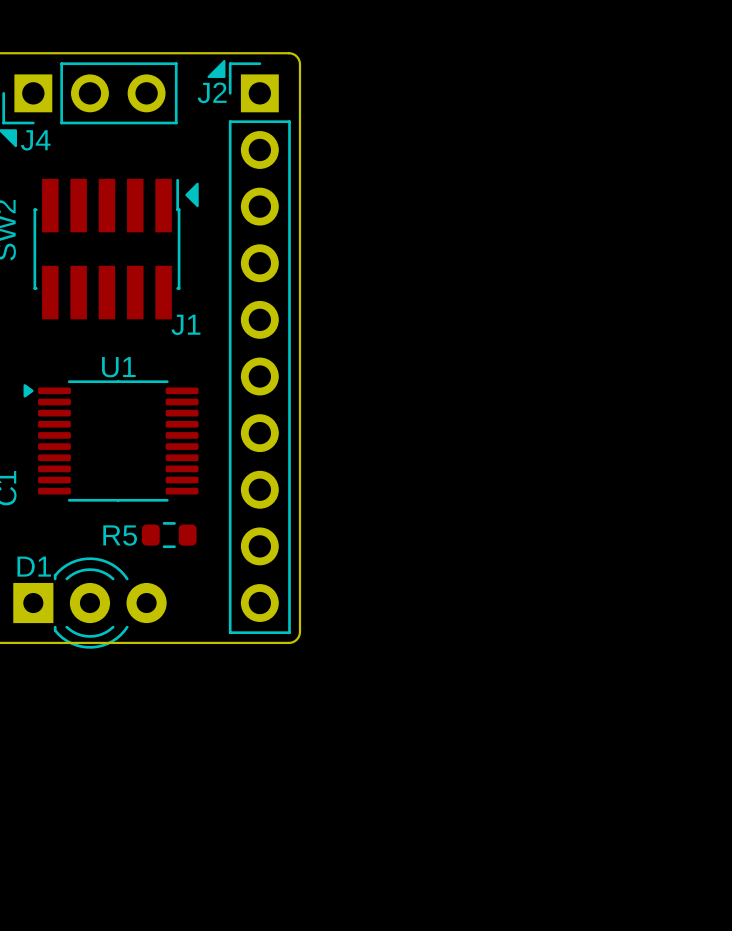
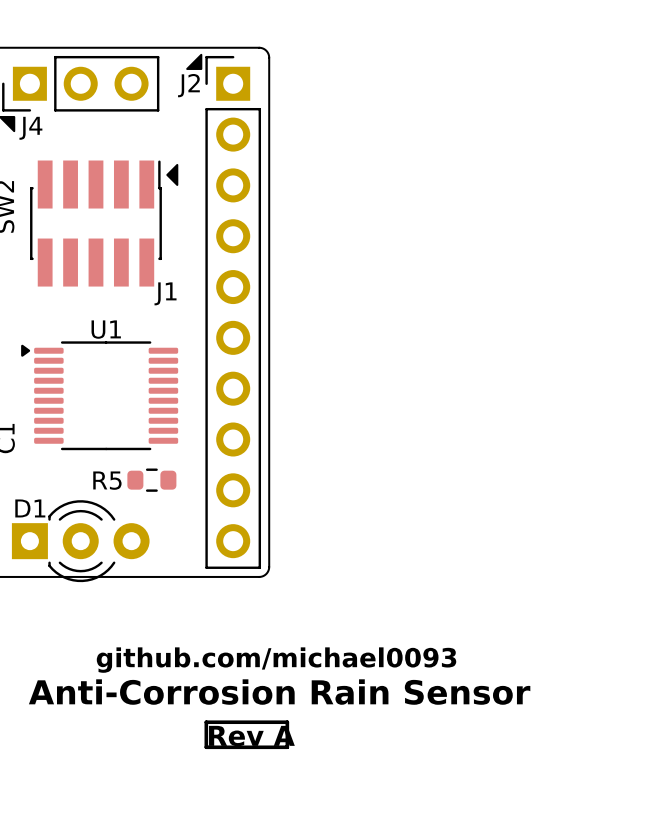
text: none -> github.com/michael0093 (276, 660)
text: none -> Anti-Corrosion Rain Sensor (279, 692)
line: none -> (206, 722) (287, 722) (287, 747) (206, 747) (206, 722)
text: none -> Rev A (251, 736)

